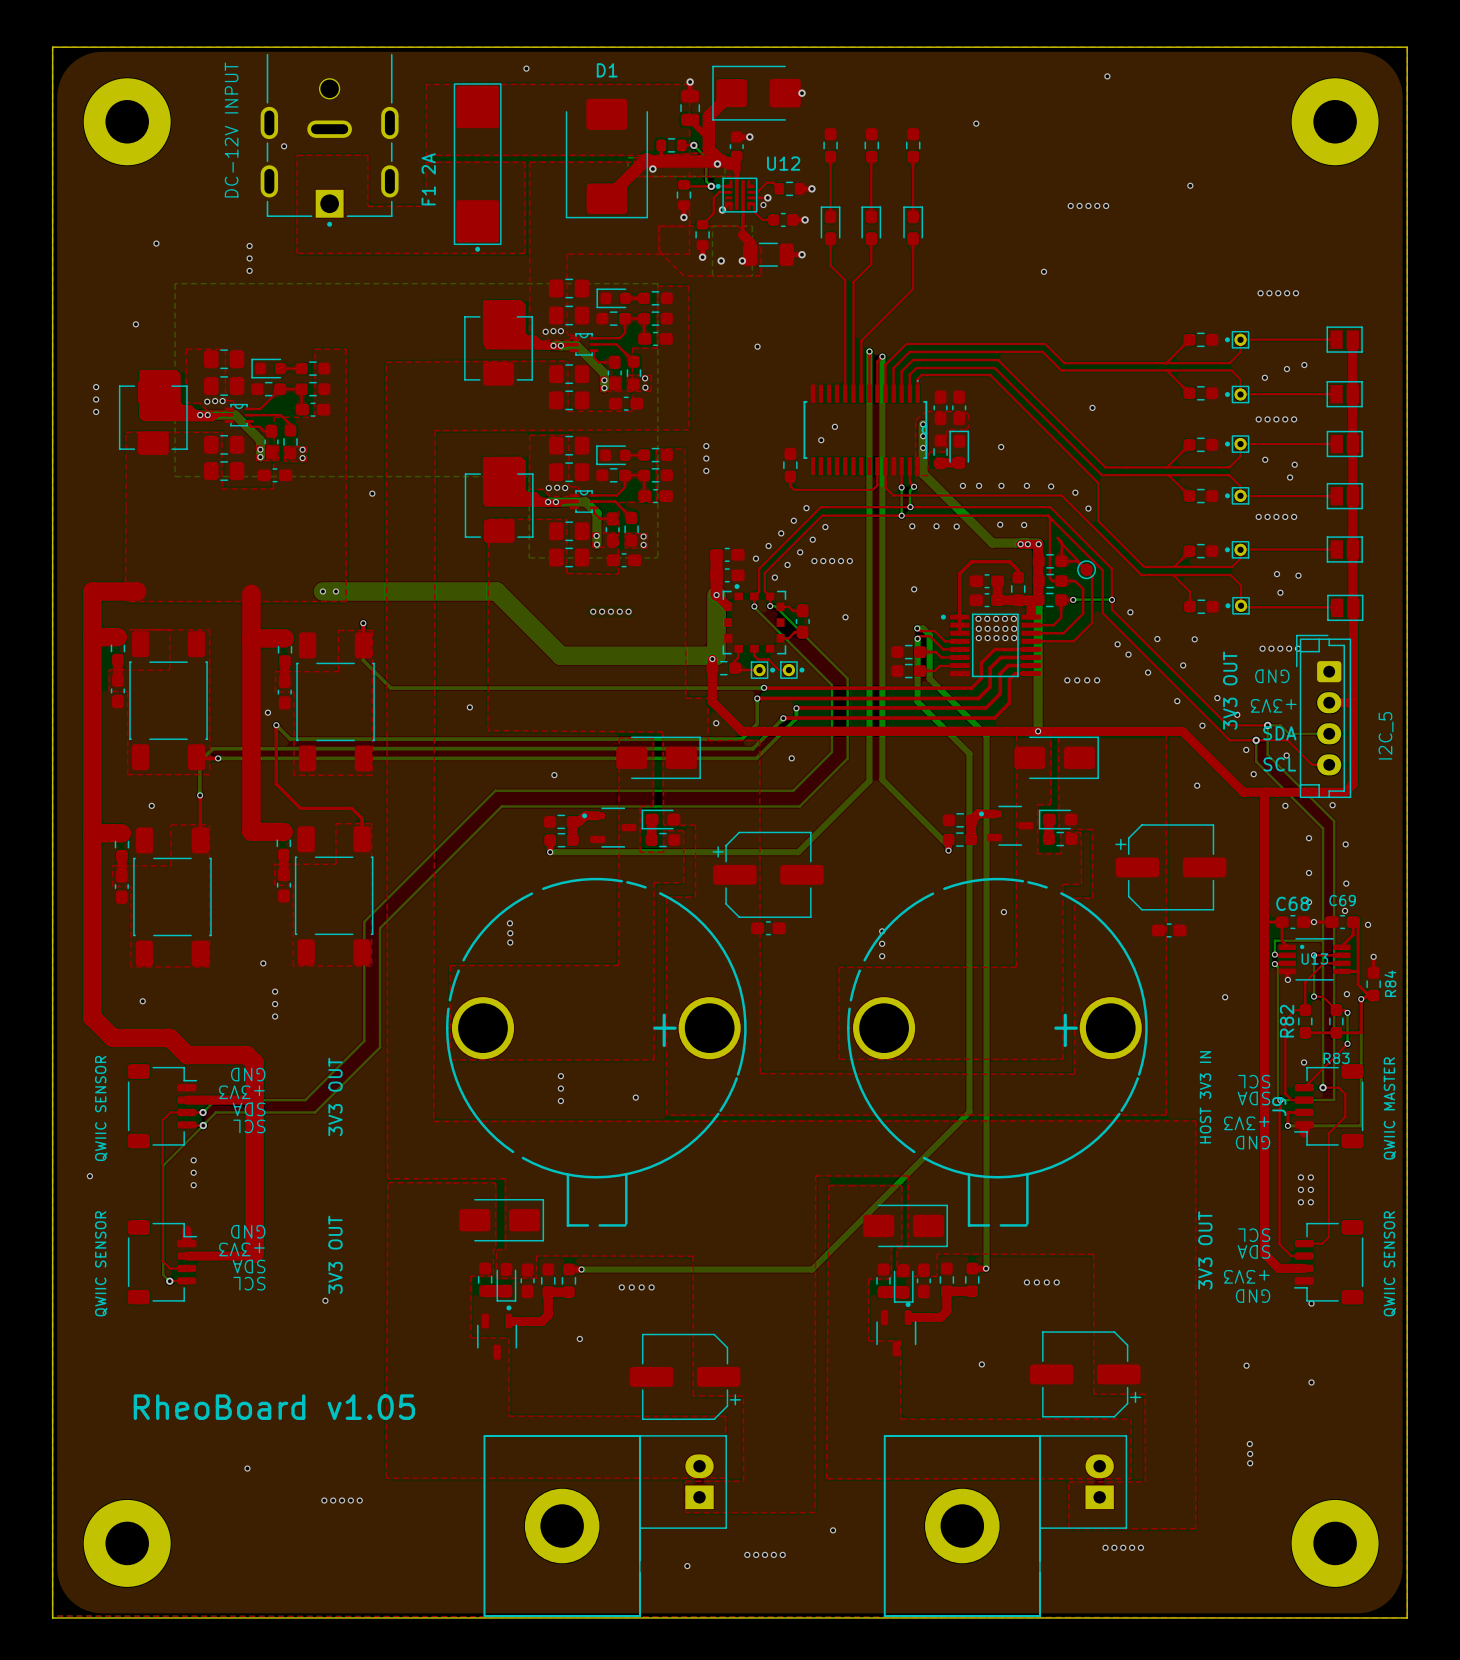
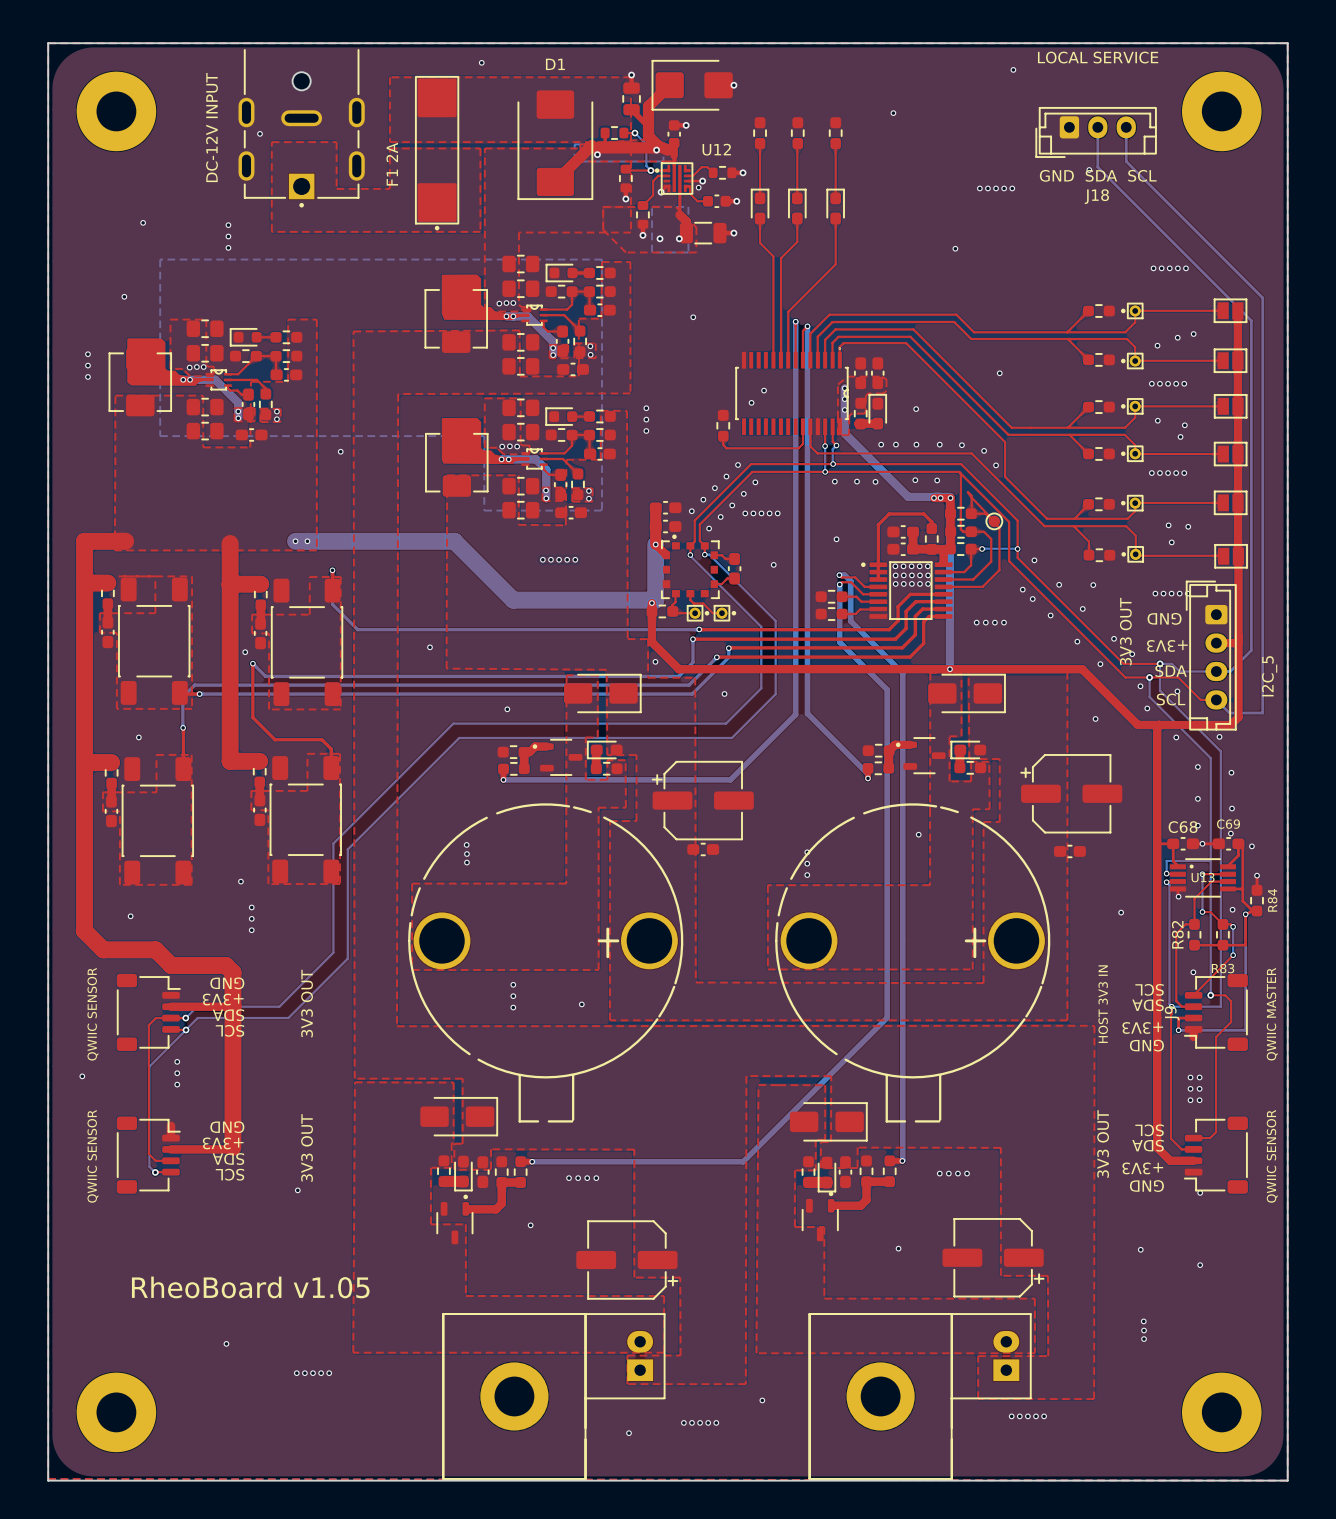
text: none -> LOCAL SERVICE (1098, 57)
bottom track: none -> (1097, 127) (1097, 167) (1251, 320) (1251, 650) (1230, 671) (1216, 671)
bottom track: none -> (1126, 127) (1126, 161) (1262, 297) (1262, 713) (1229, 713) (1216, 699)
part: none -> (1096, 132)
text: none -> GND SDA SCL (1098, 175)
text: none -> J18 (1096, 196)

